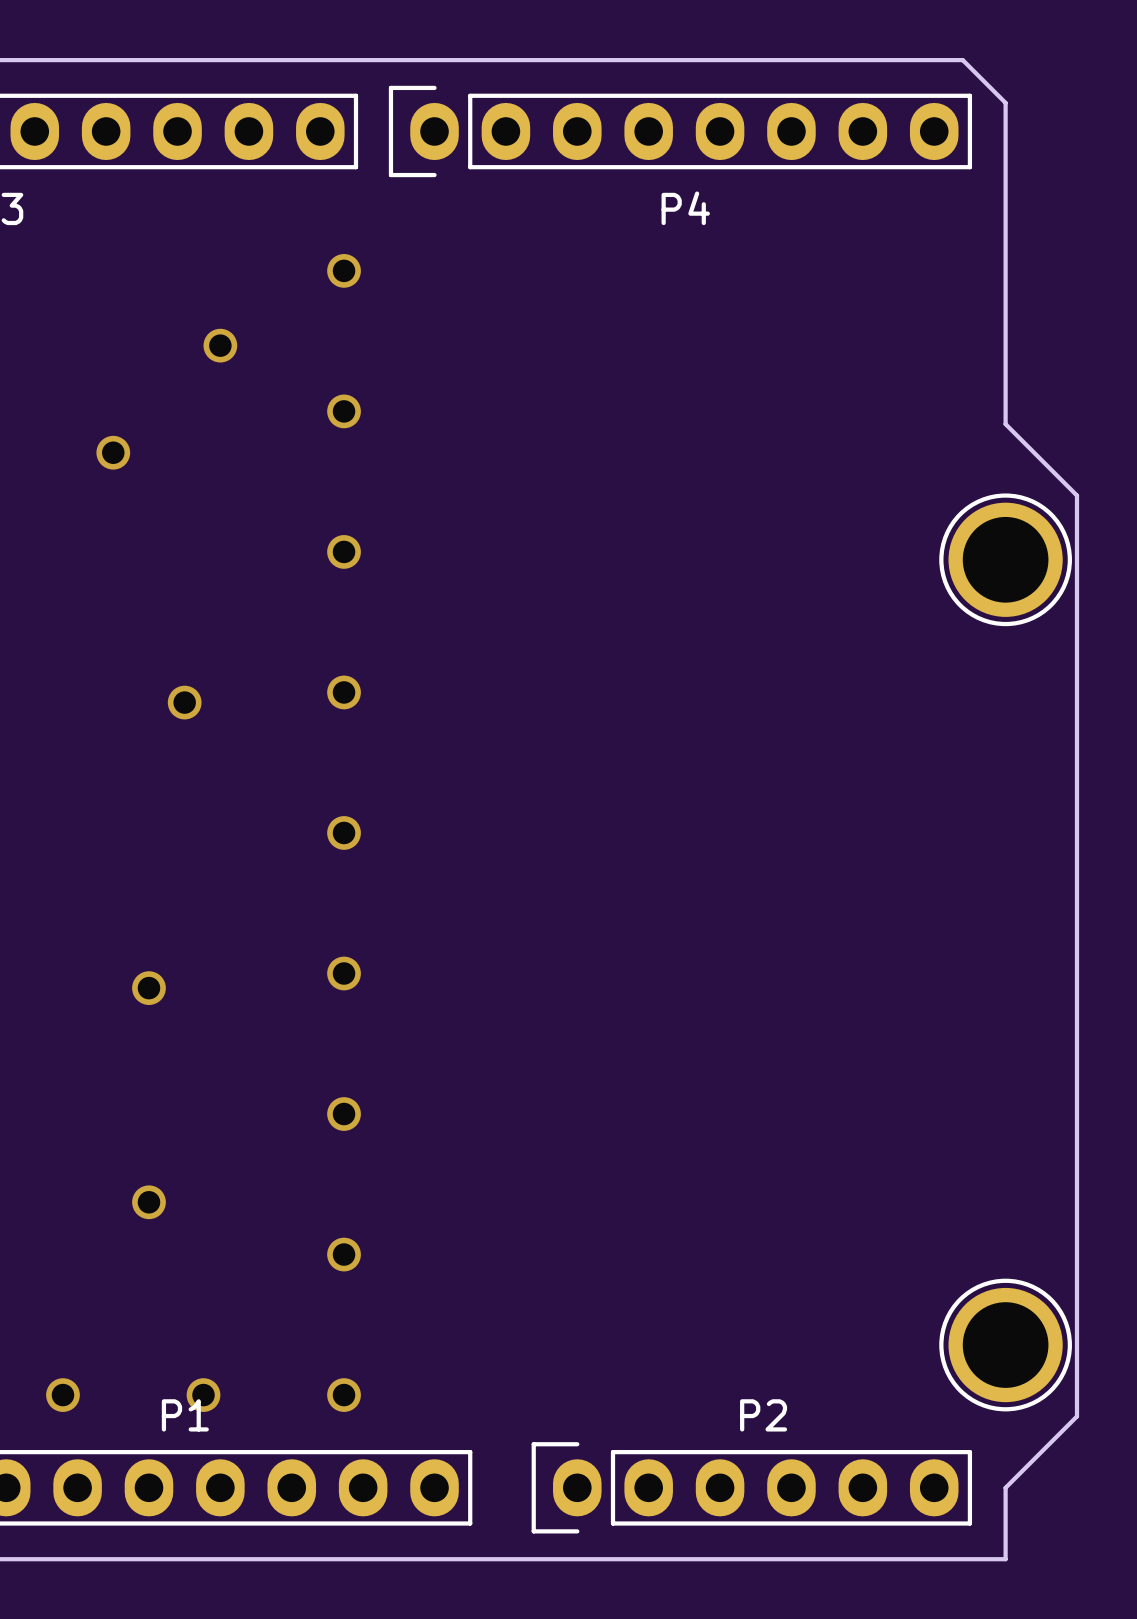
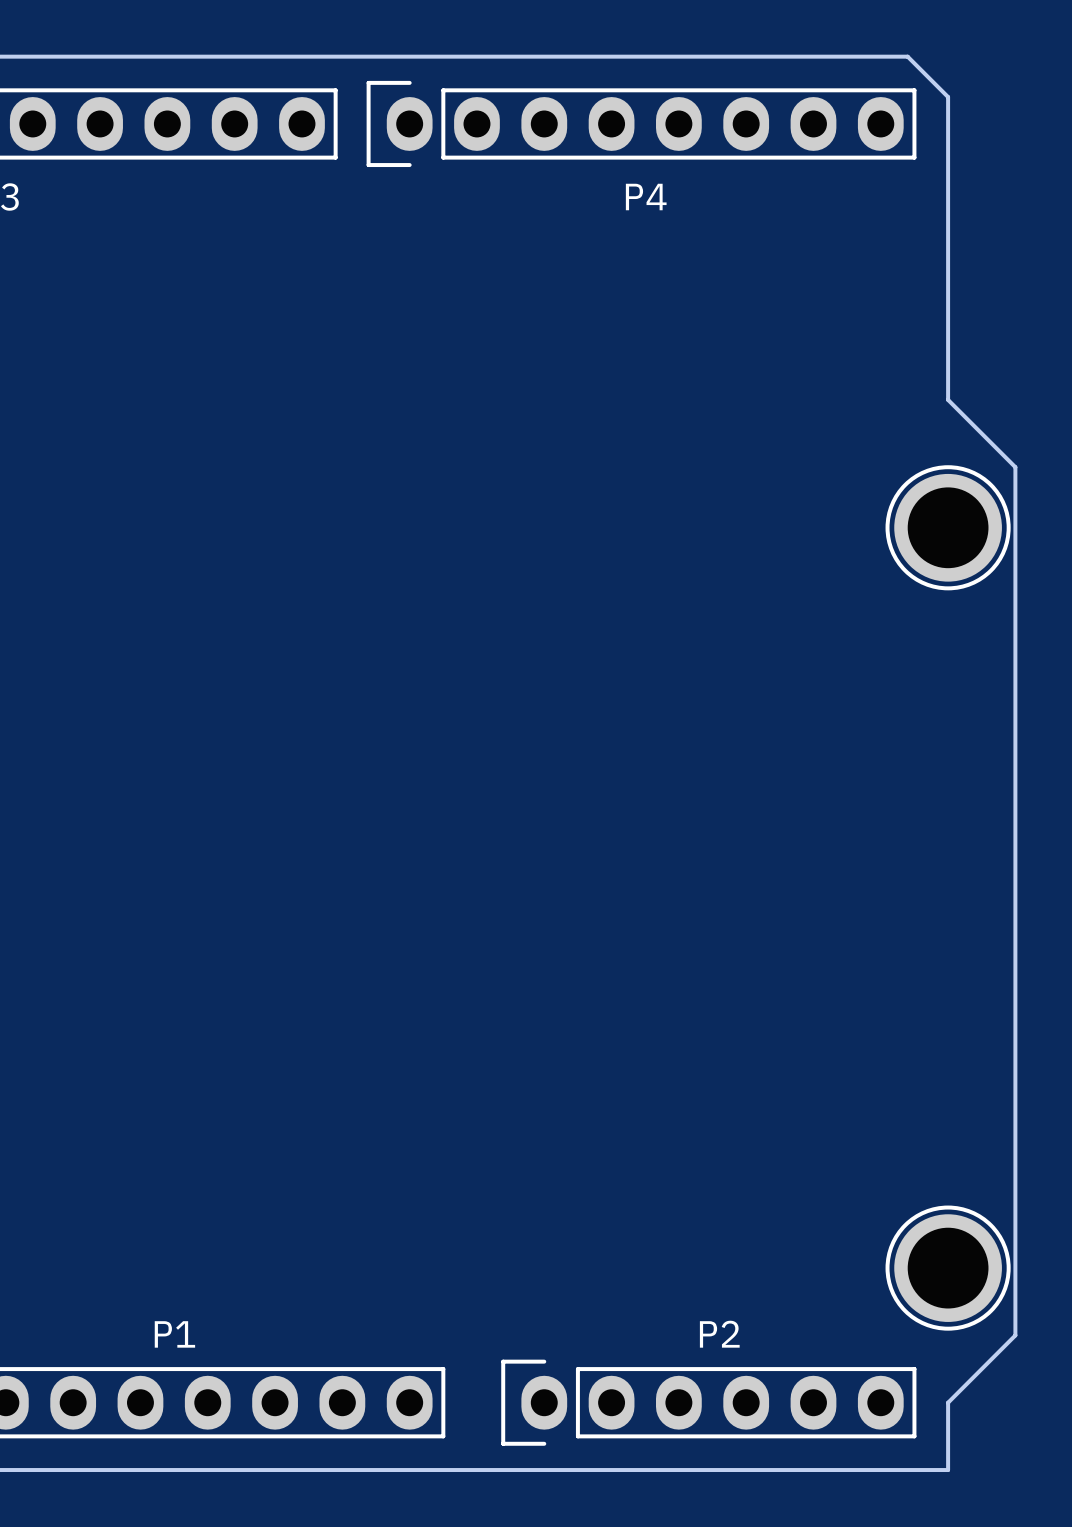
via: (344, 270) -> none
via: (220, 345) -> none
via: (344, 411) -> none
via: (113, 452) -> none
via: (344, 551) -> none
via: (344, 692) -> none
via: (184, 702) -> none
via: (344, 832) -> none
via: (344, 973) -> none
via: (148, 988) -> none
via: (344, 1114) -> none
via: (148, 1202) -> none
via: (344, 1254) -> none
via: (62, 1395) -> none
via: (203, 1395) -> none
via: (344, 1395) -> none

